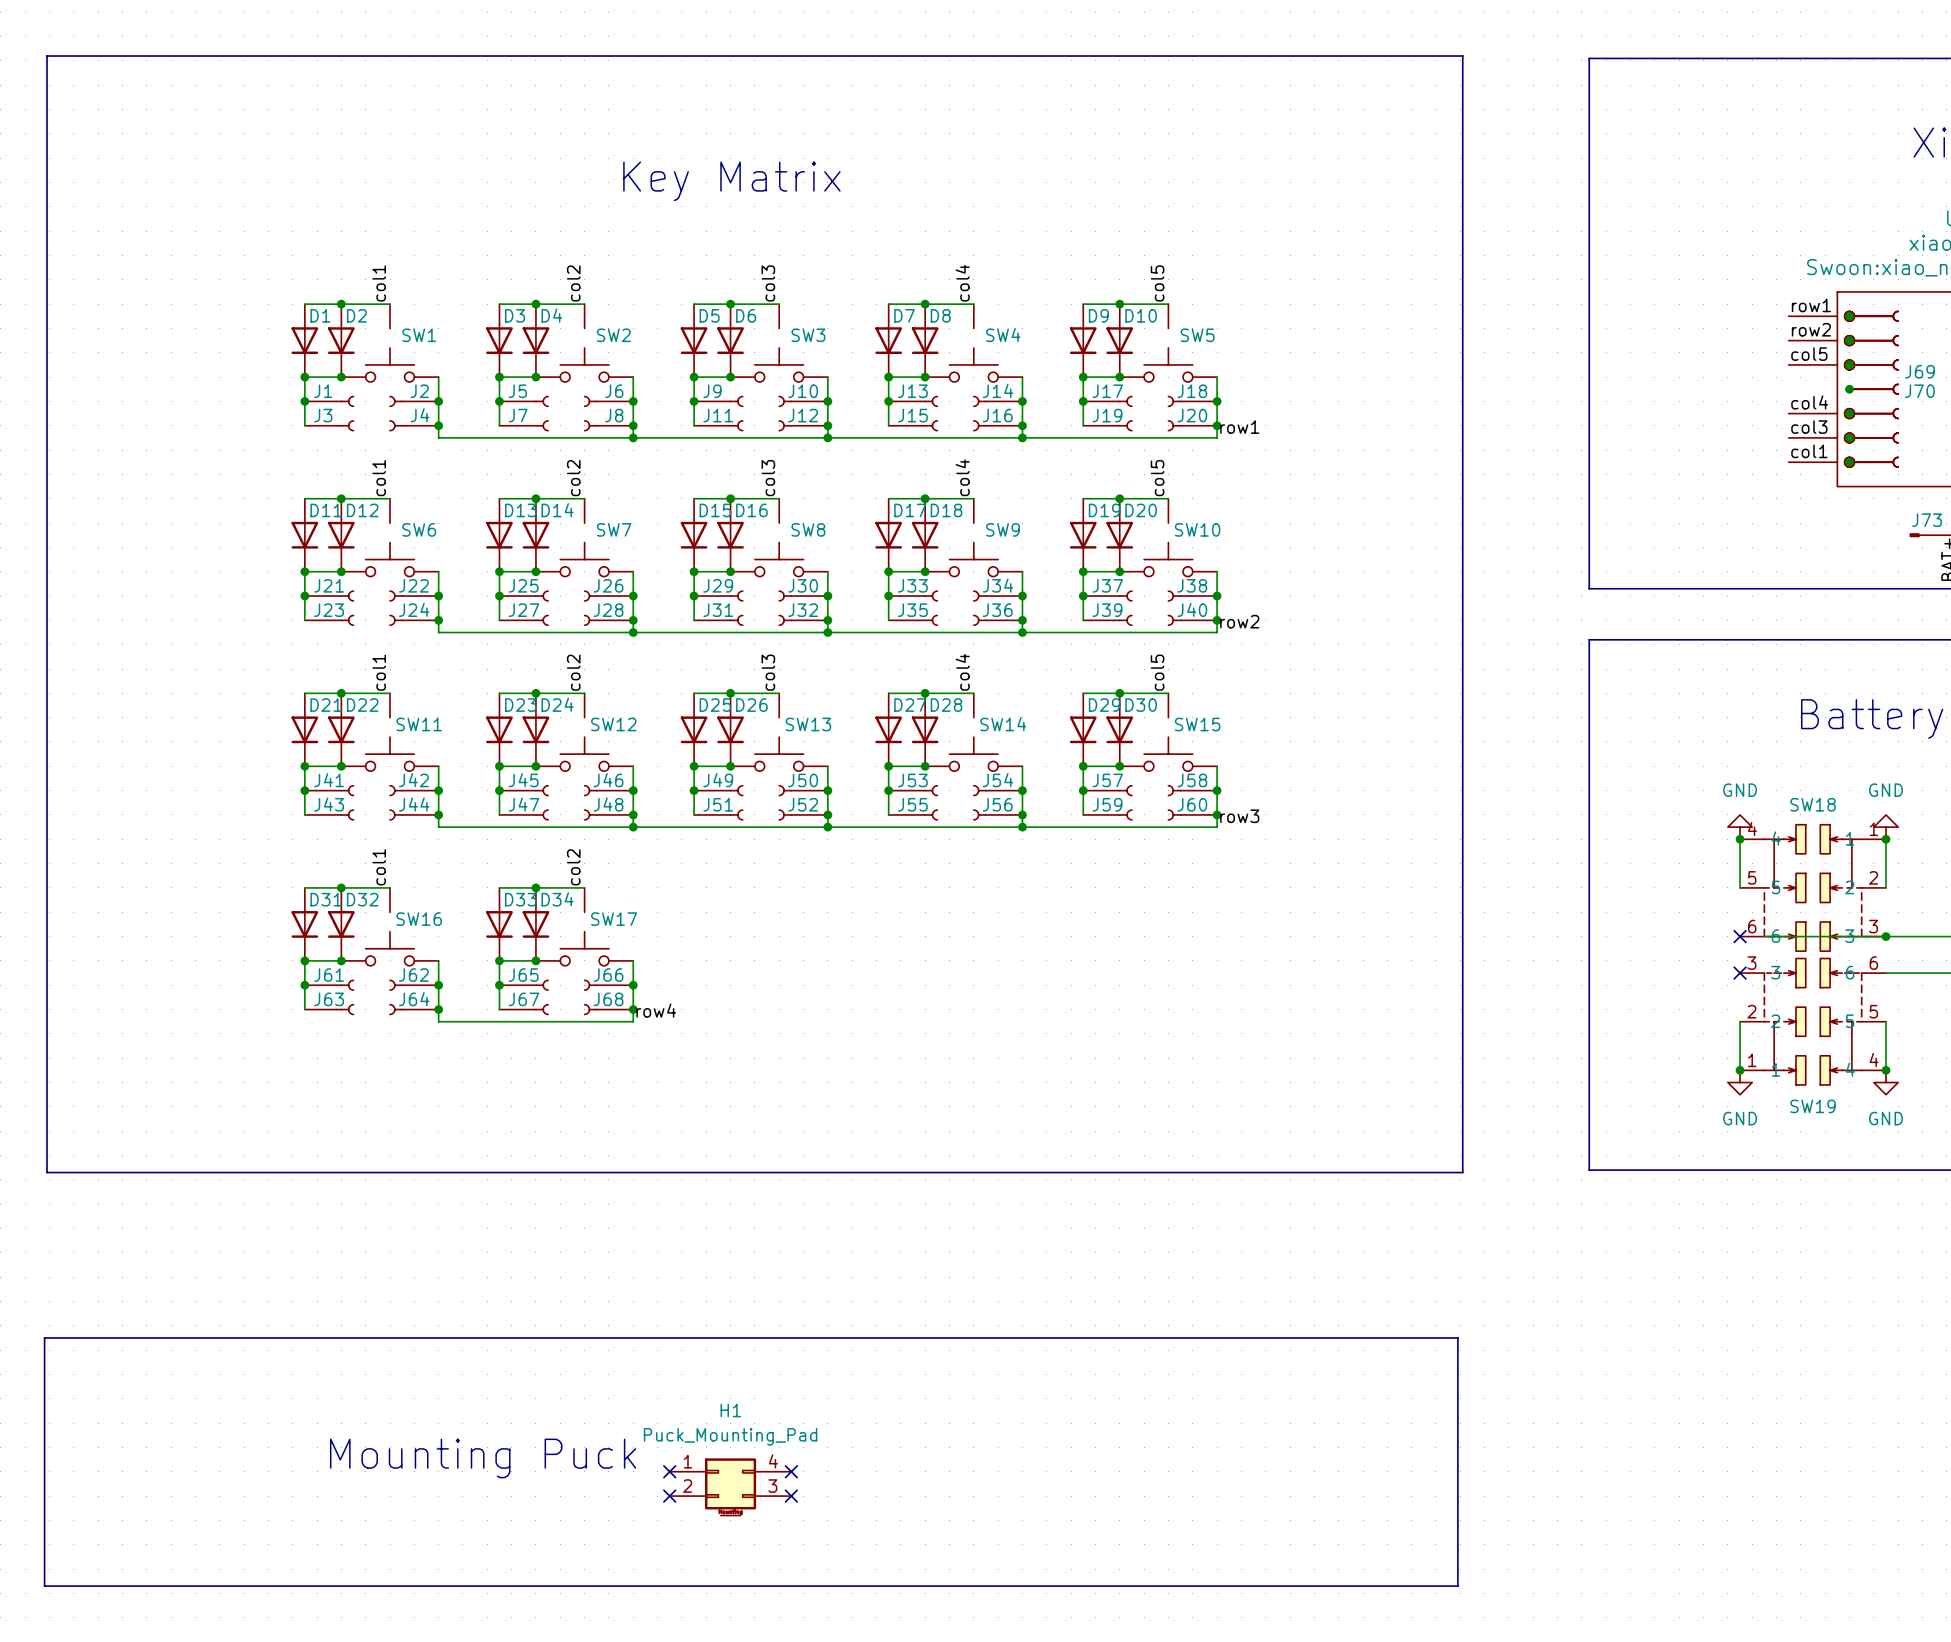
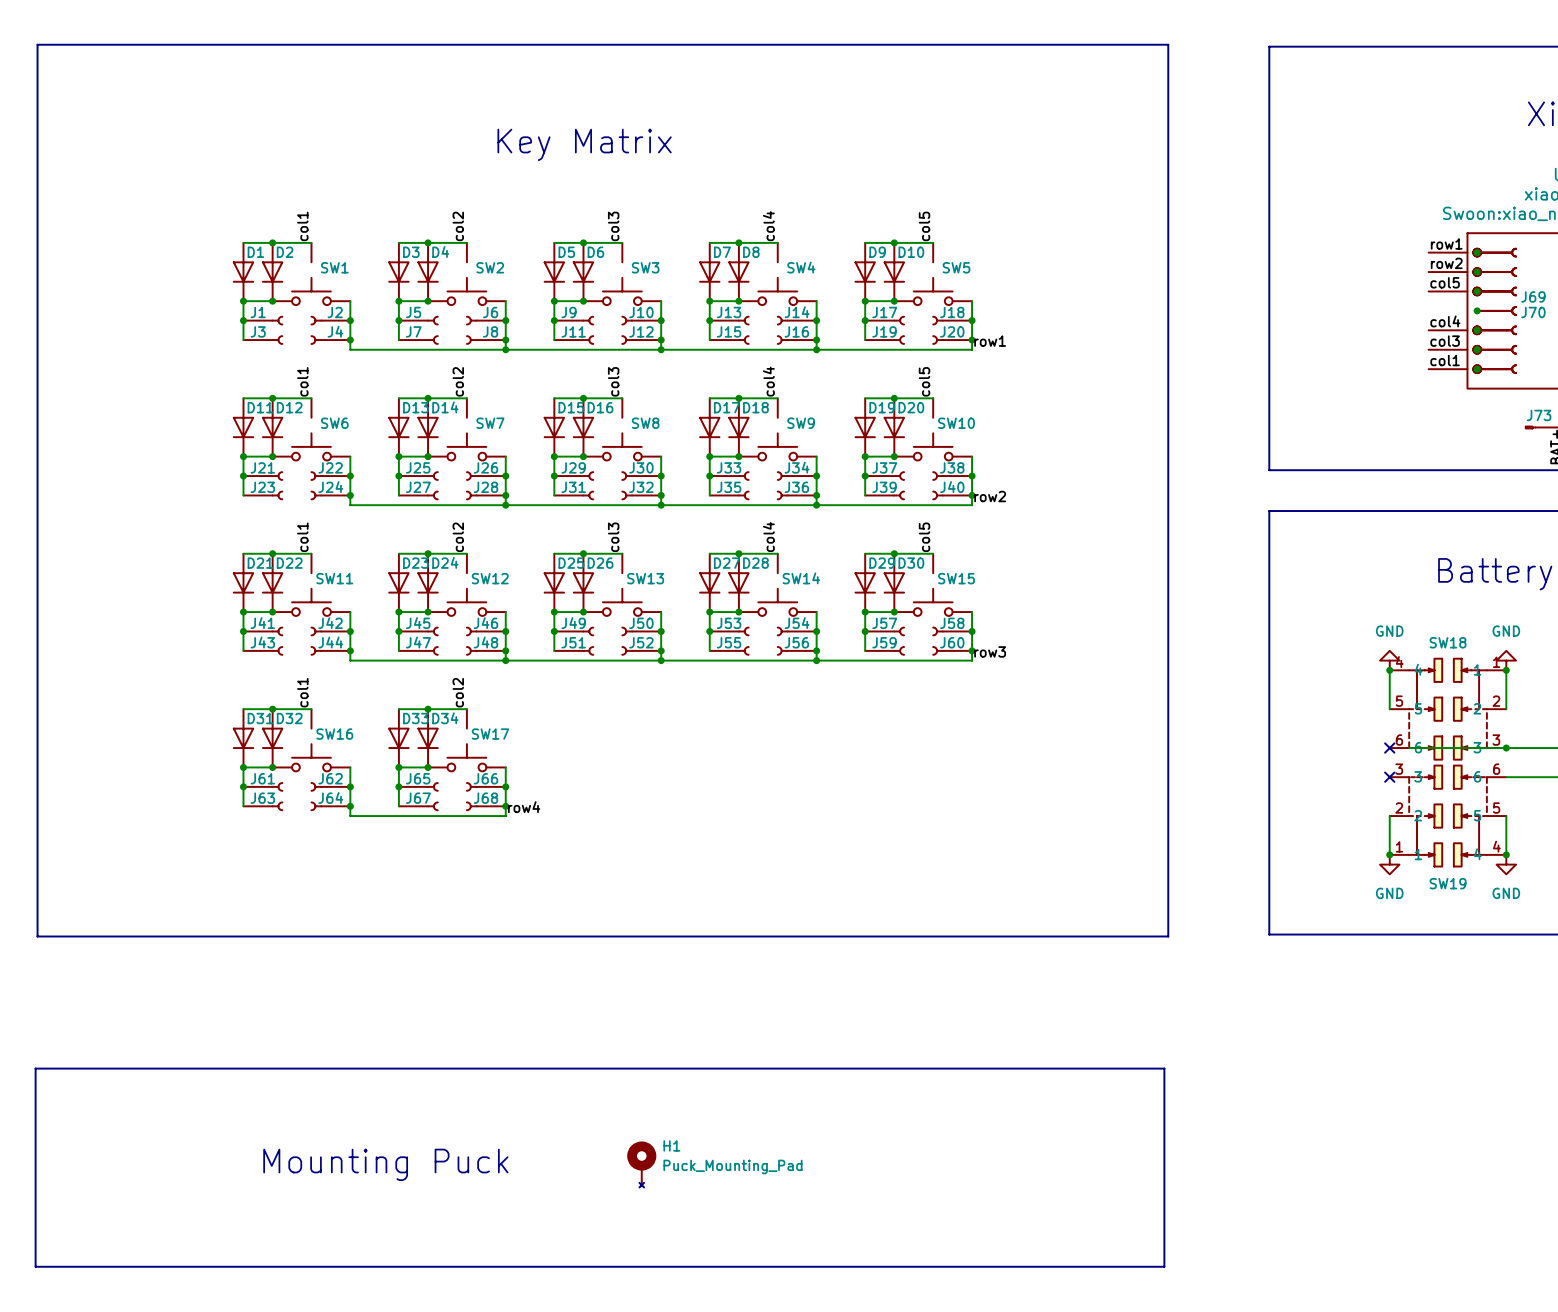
H1 name position: H1 (730, 1410) -> H1 (671, 1145)
H1 value position: Puck_Mounting_Pad (730, 1436) -> Puck_Mounting_Pad (732, 1166)
H1 symbol: [669, 1458, 792, 1517] -> [627, 1141, 657, 1188]
no-connect mark: (669, 1471) -> none
no-connect mark: (791, 1471) -> none
no-connect mark: (669, 1496) -> none
no-connect mark: (791, 1496) -> none

